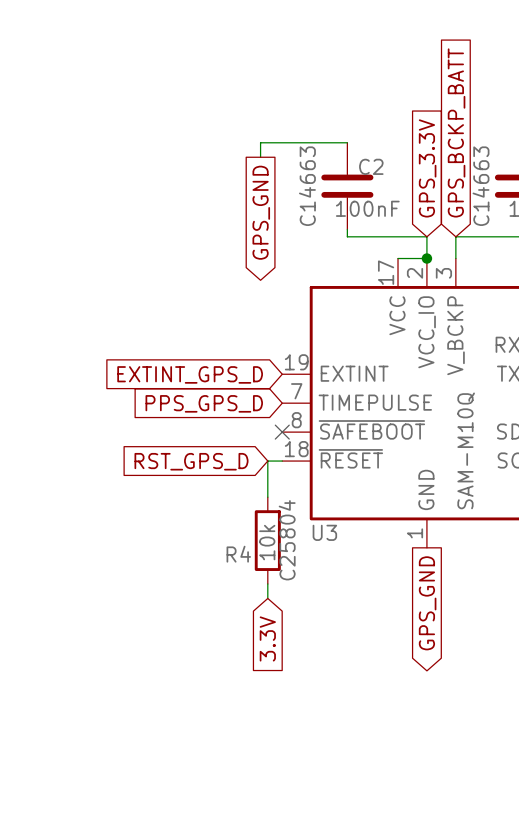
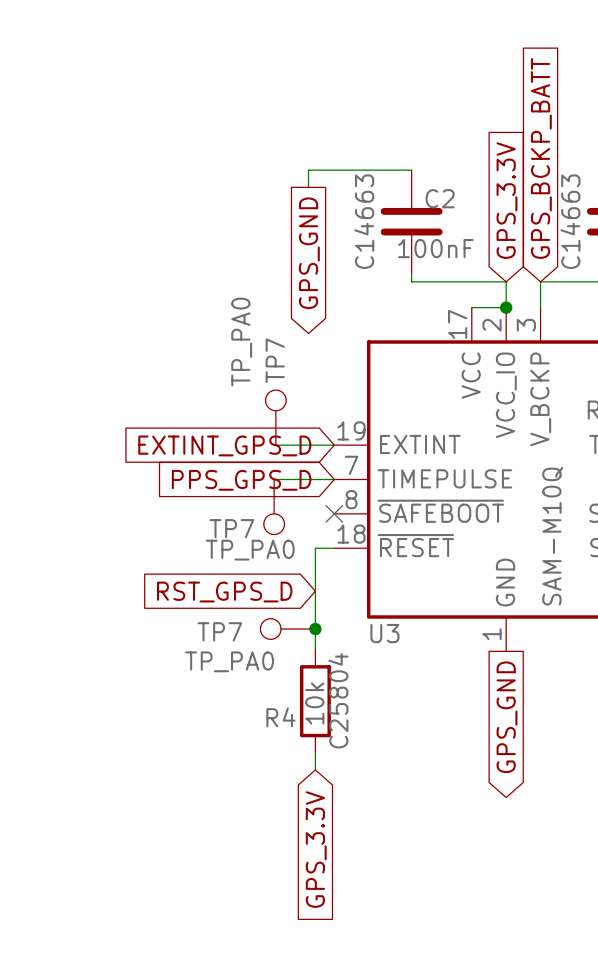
TP7: none -> TP_PA0 (275, 417)
wire: none -> (275, 445) (334, 445)
wire: none -> (274, 479) (334, 479)
TP7: none -> TP_PA0 (274, 507)
global label position: RST_GPS_D (191, 461) -> RST_GPS_D (224, 592)
wire: (267, 461) (267, 497) -> (317, 548) (315, 548) (315, 649)
TP7: none -> TP_PA0 (287, 629)
junction: none -> (315, 629)
R4 position: (267, 540) -> (315, 701)
wire: (267, 584) (267, 598) -> (315, 752) (315, 769)
global label: 3.3V (267, 638) -> GPS_3.3V (316, 849)

